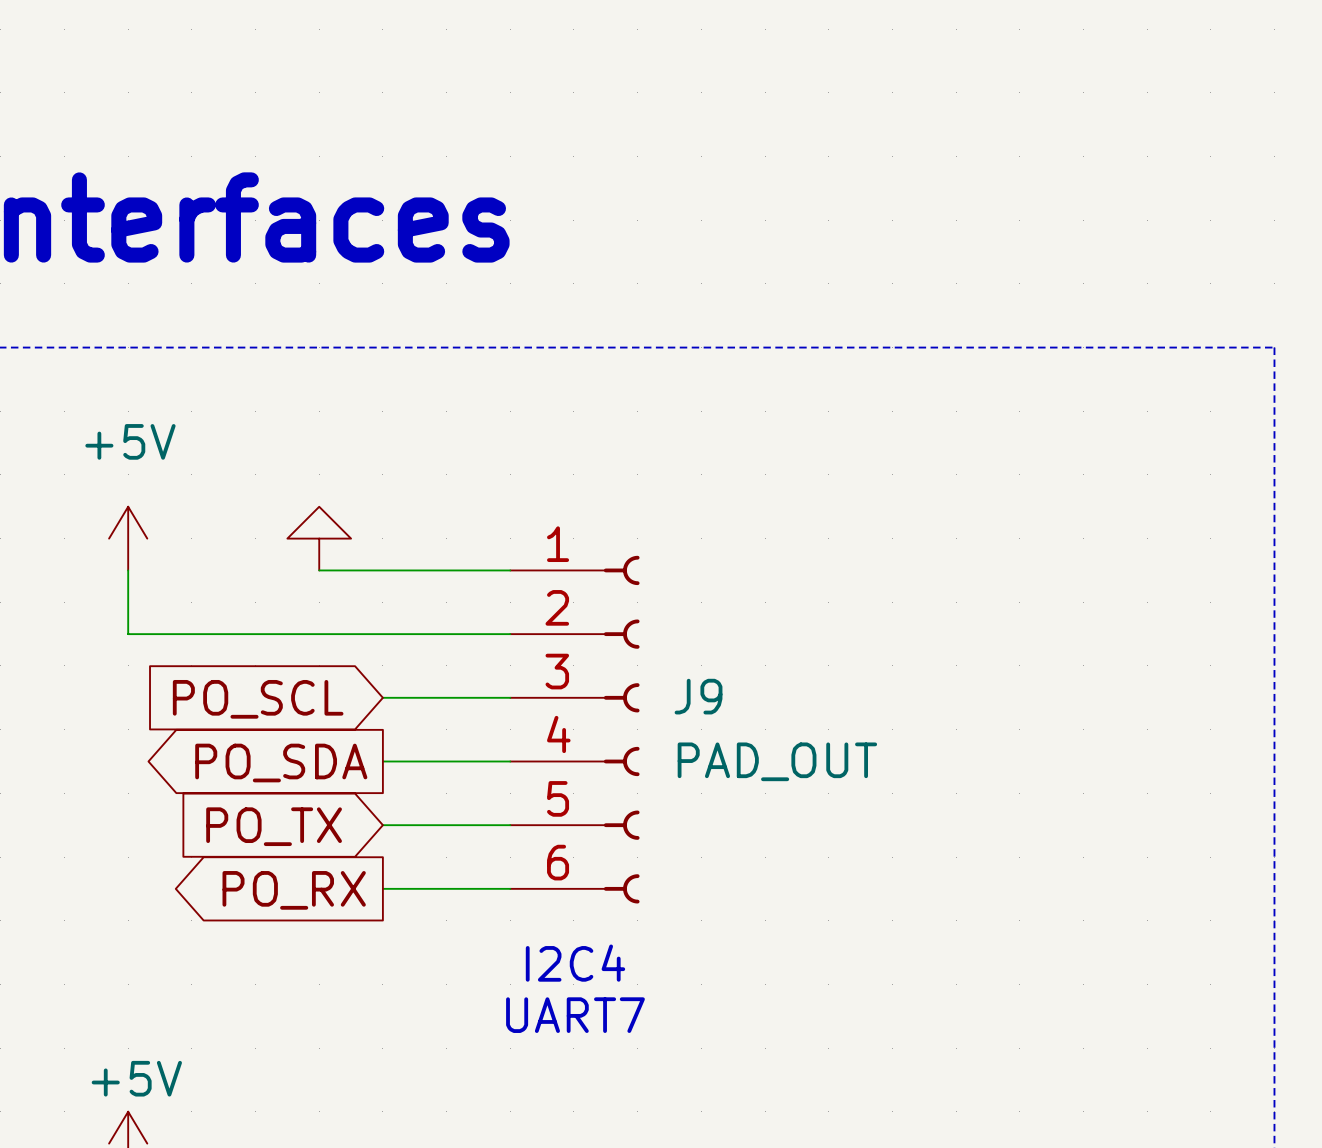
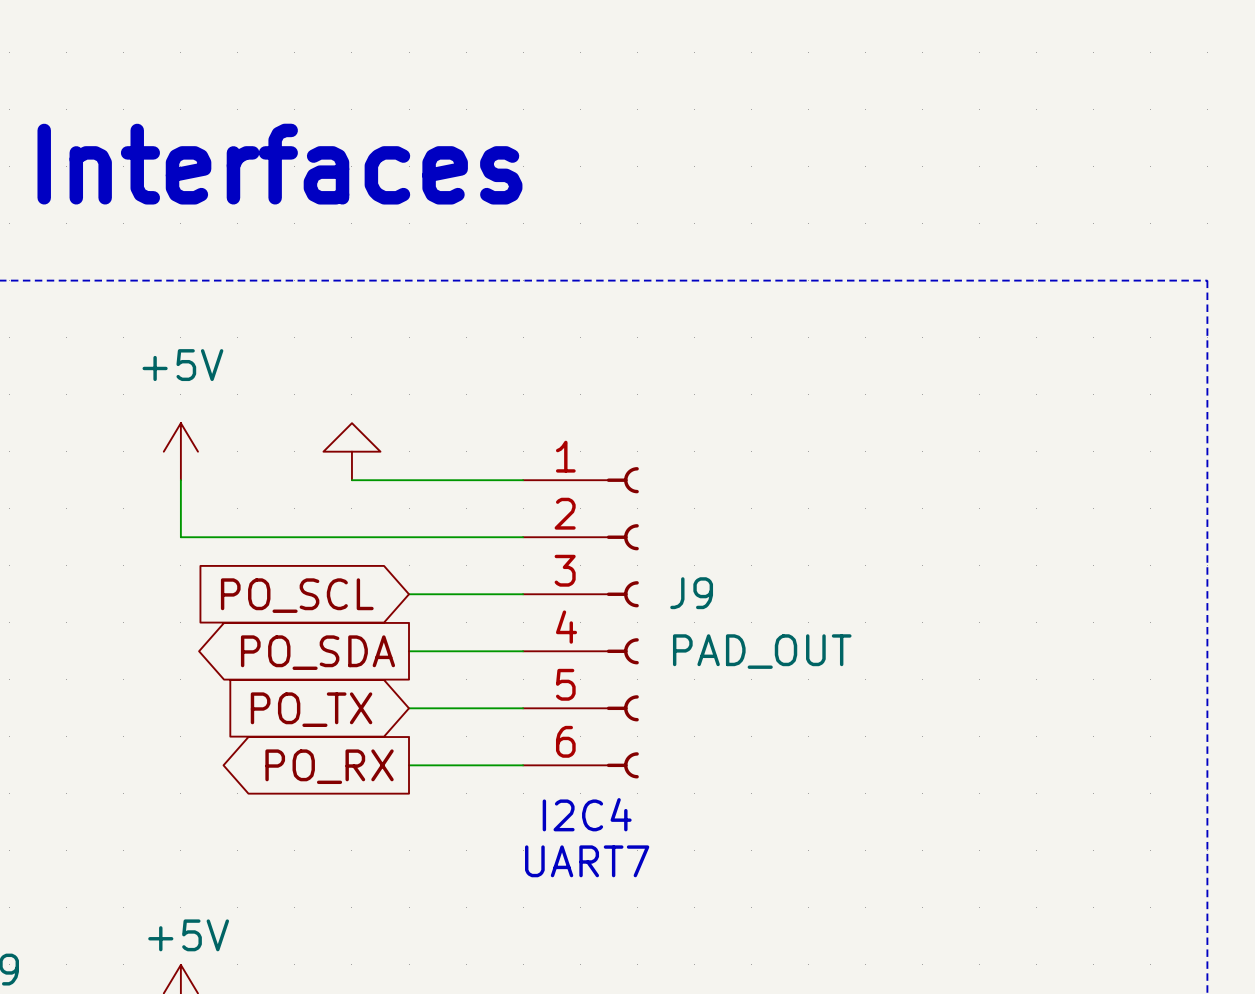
text position: I2C4 (575, 963) -> I2C4 (587, 814)
text position: UART7 (575, 1015) -> UART7 (587, 861)

